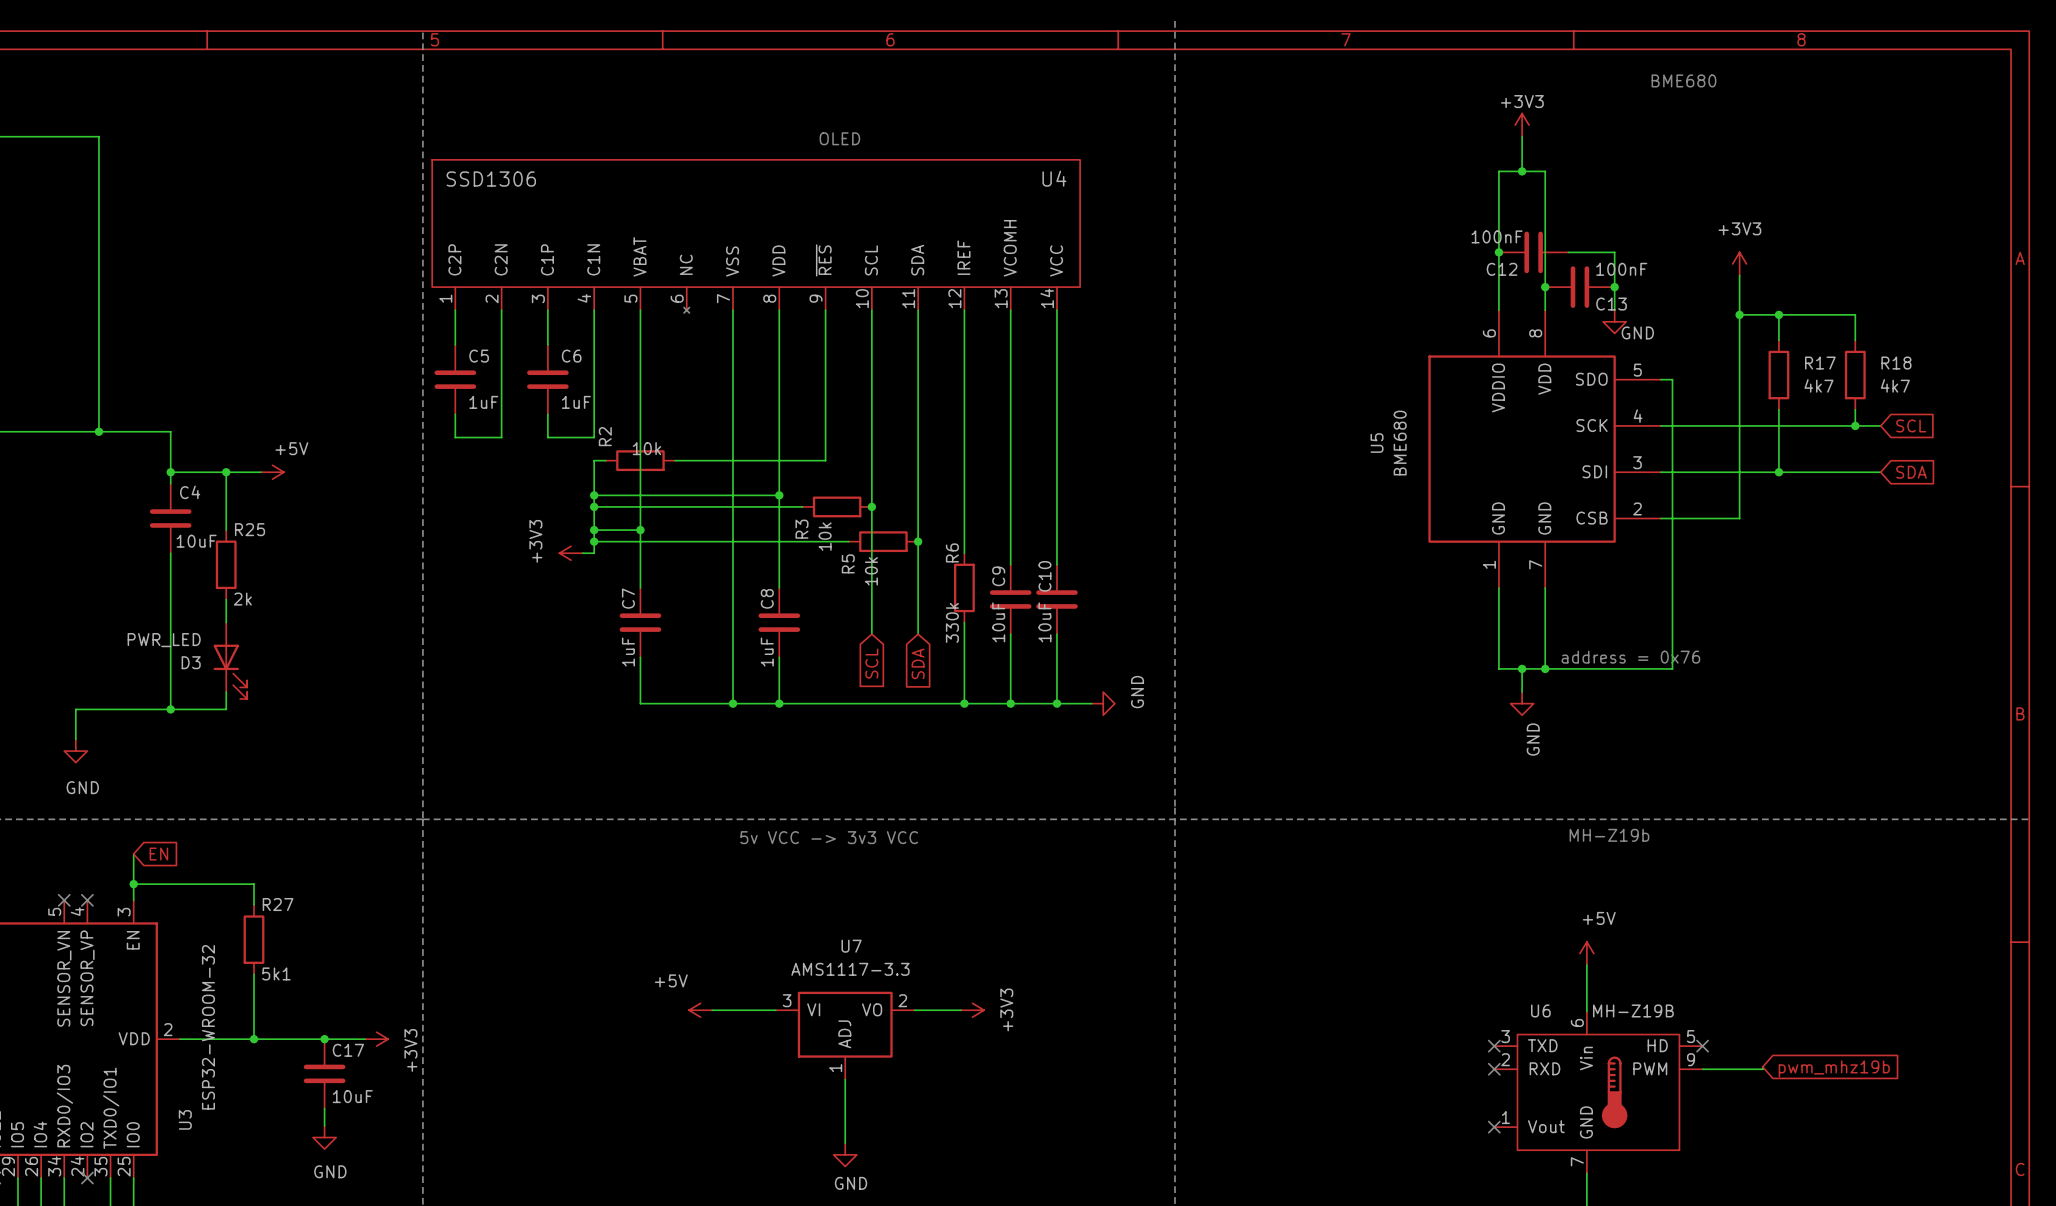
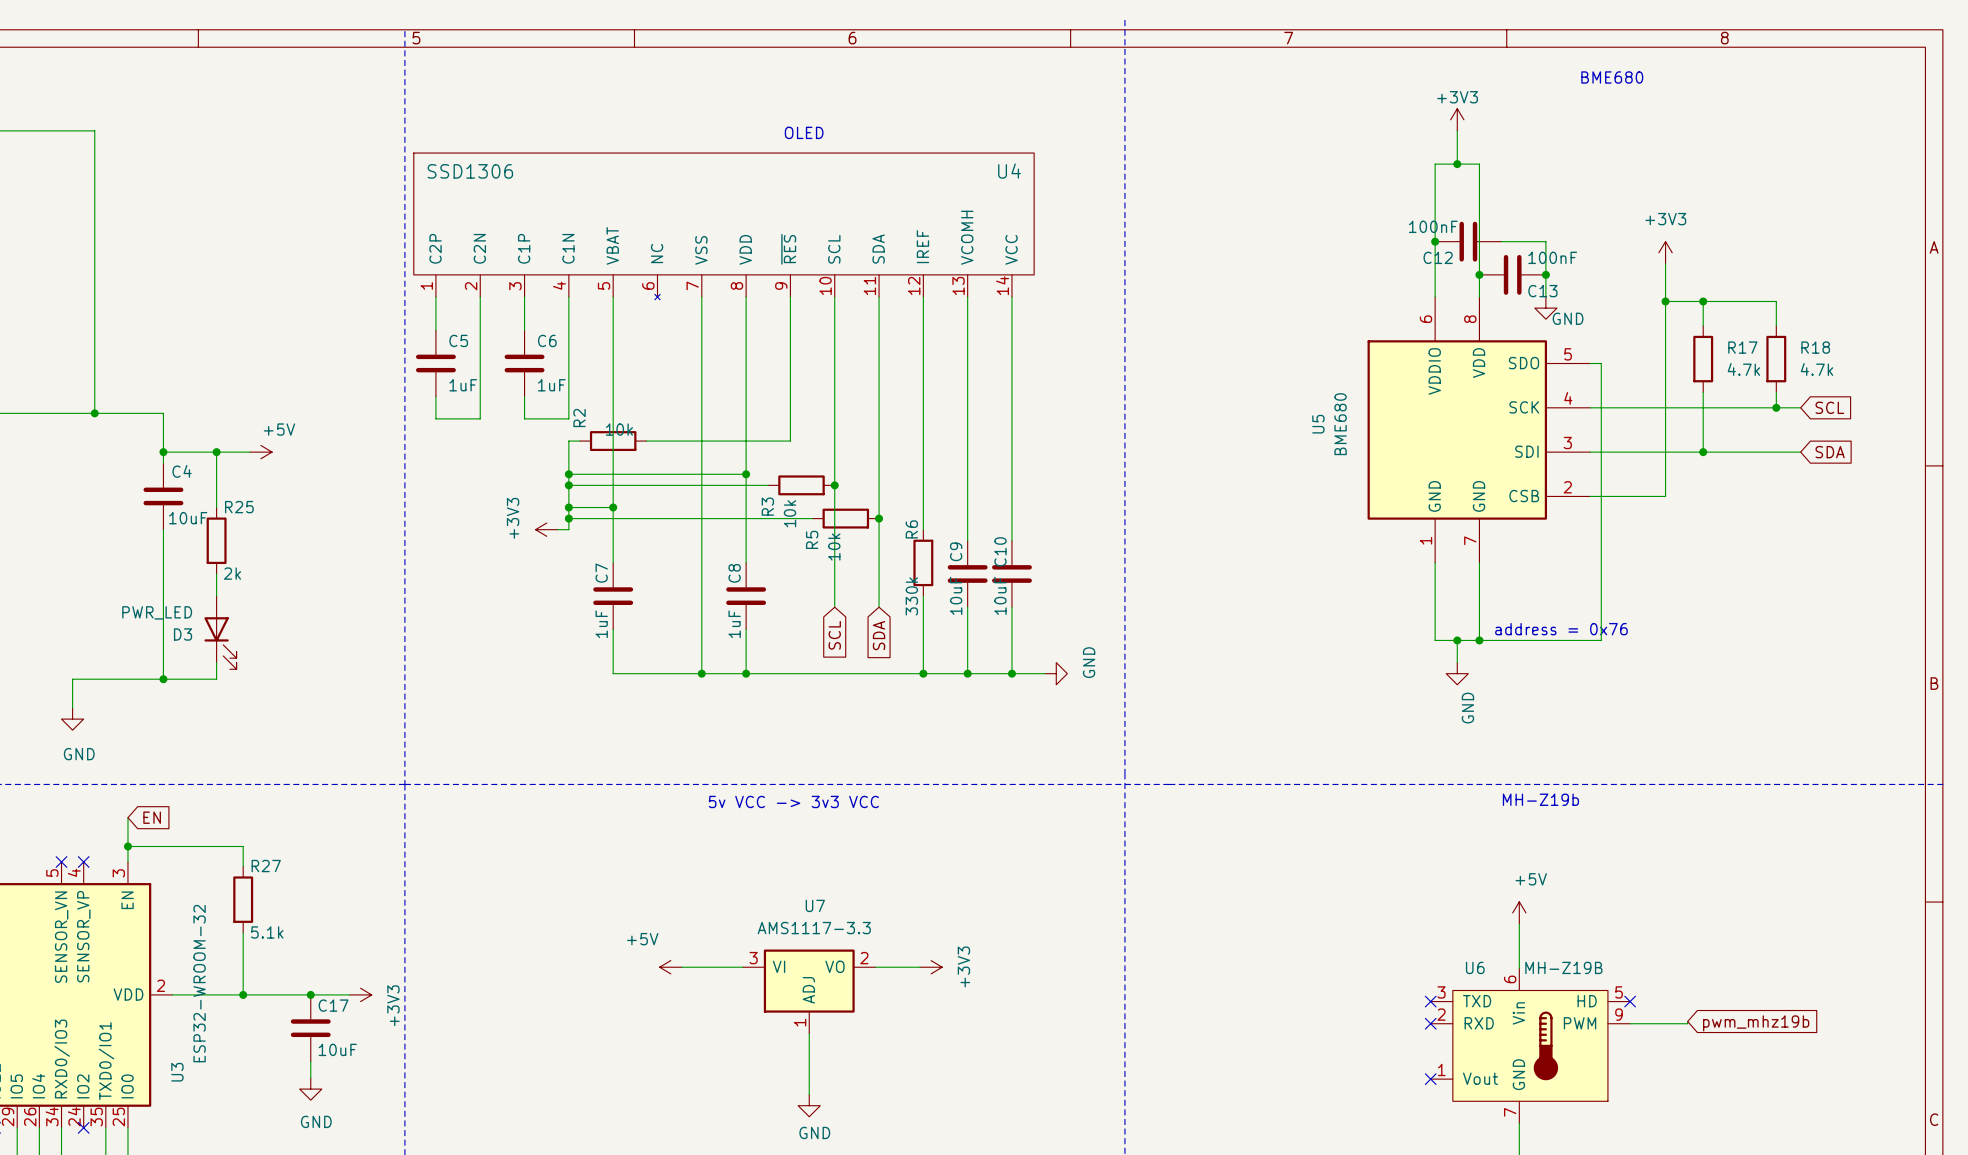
R17 value: 4k7 (1818, 385) -> 4.7k (1743, 369)
R18 value: 4k7 (1895, 385) -> 4.7k (1817, 369)
R27 value: 5k1 (276, 973) -> 5.1k (267, 932)

